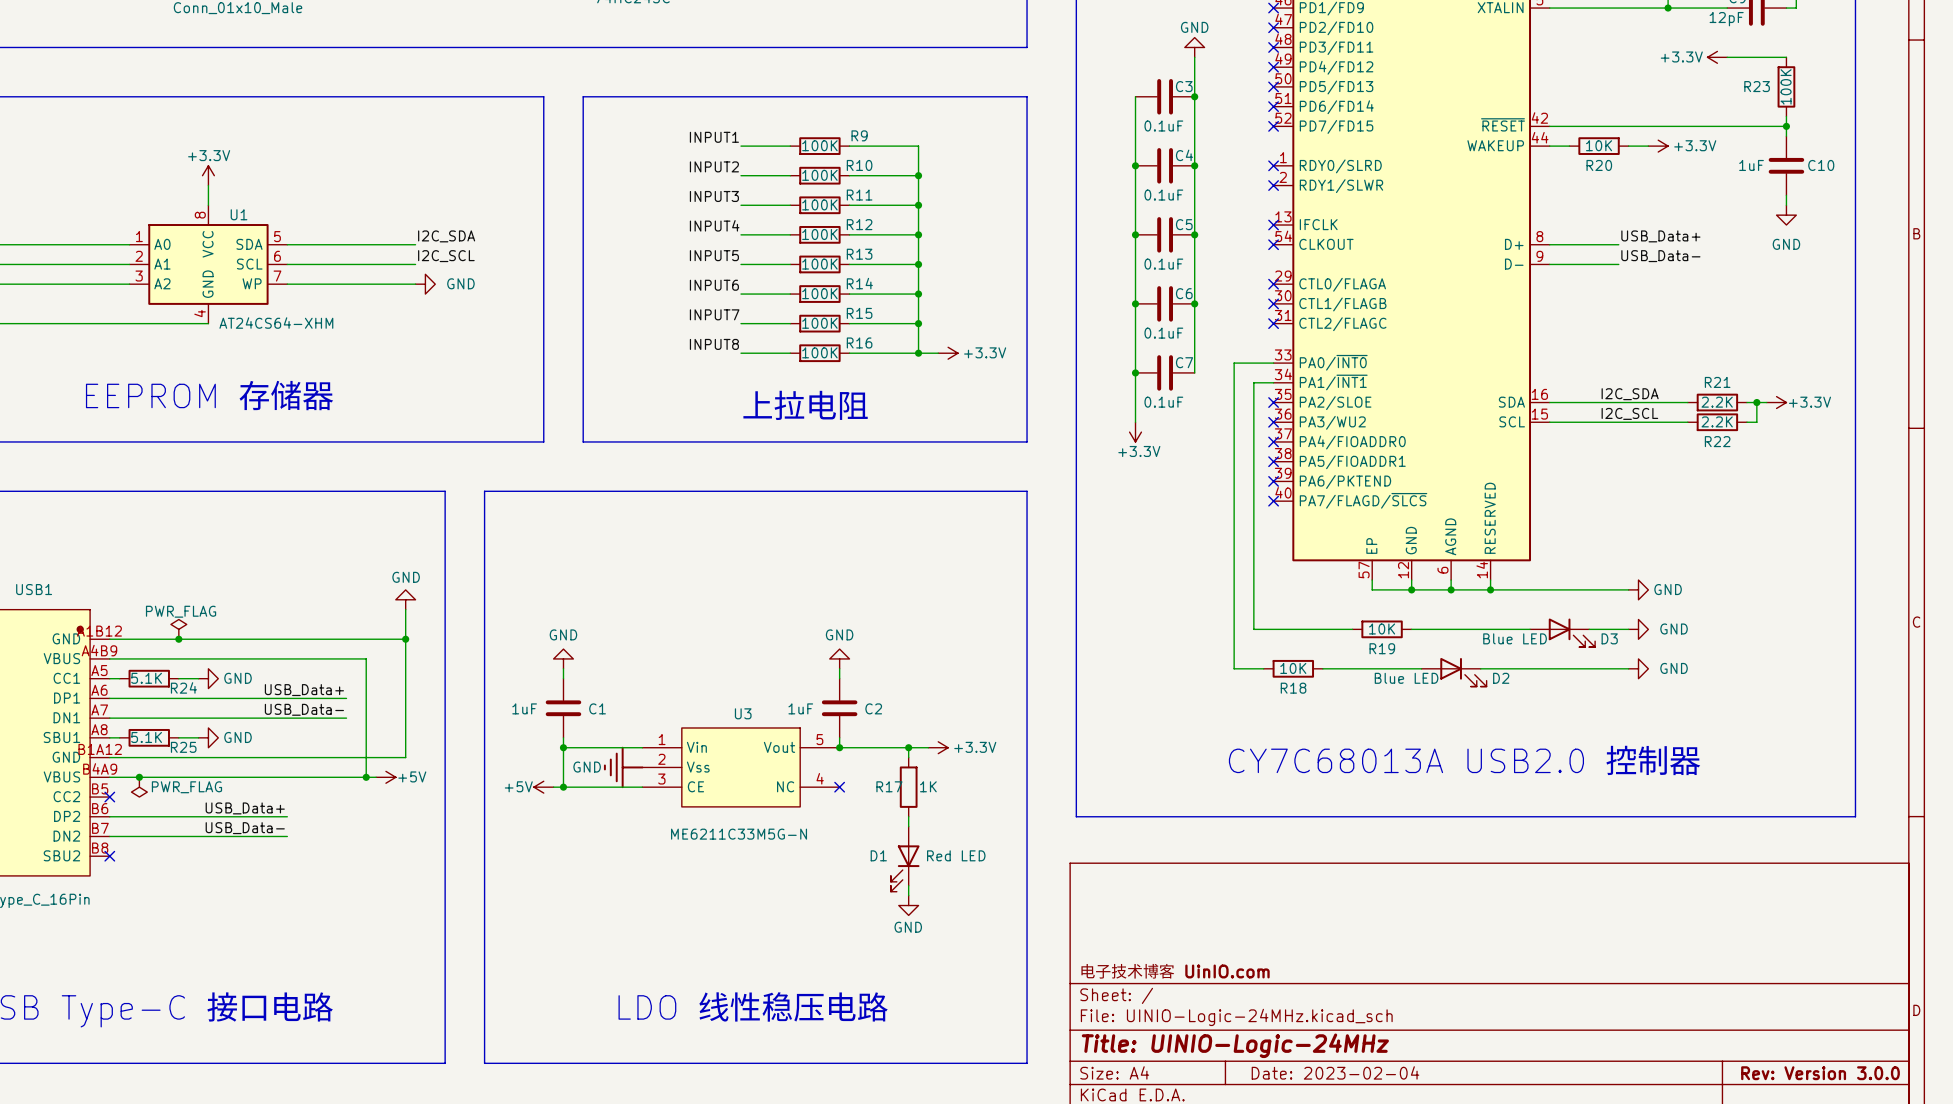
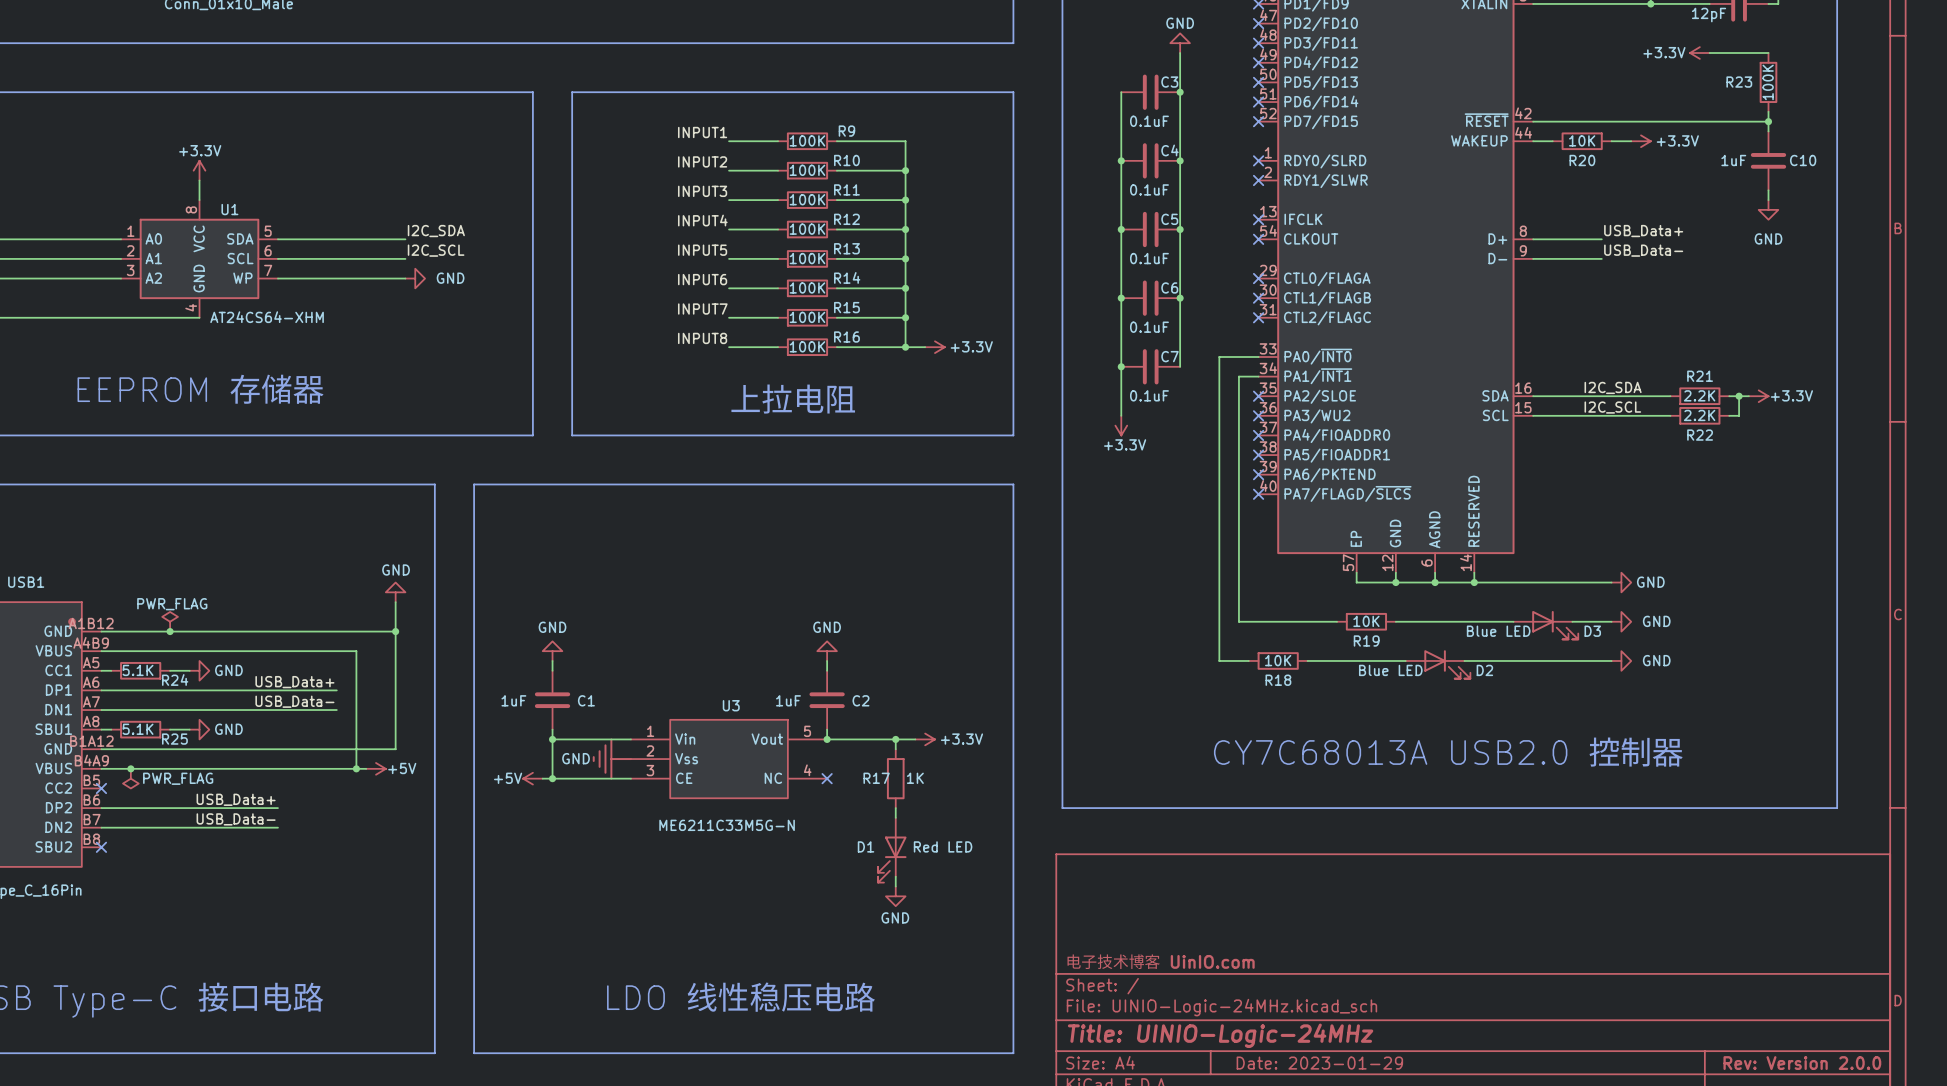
title block: Date: 2023-02-04 (1335, 1072) -> Date: 2023-01-29 (1319, 1063)
title block: Rev: Version 3.0.0 (1820, 1073) -> Rev: Version 2.0.0 (1802, 1063)

